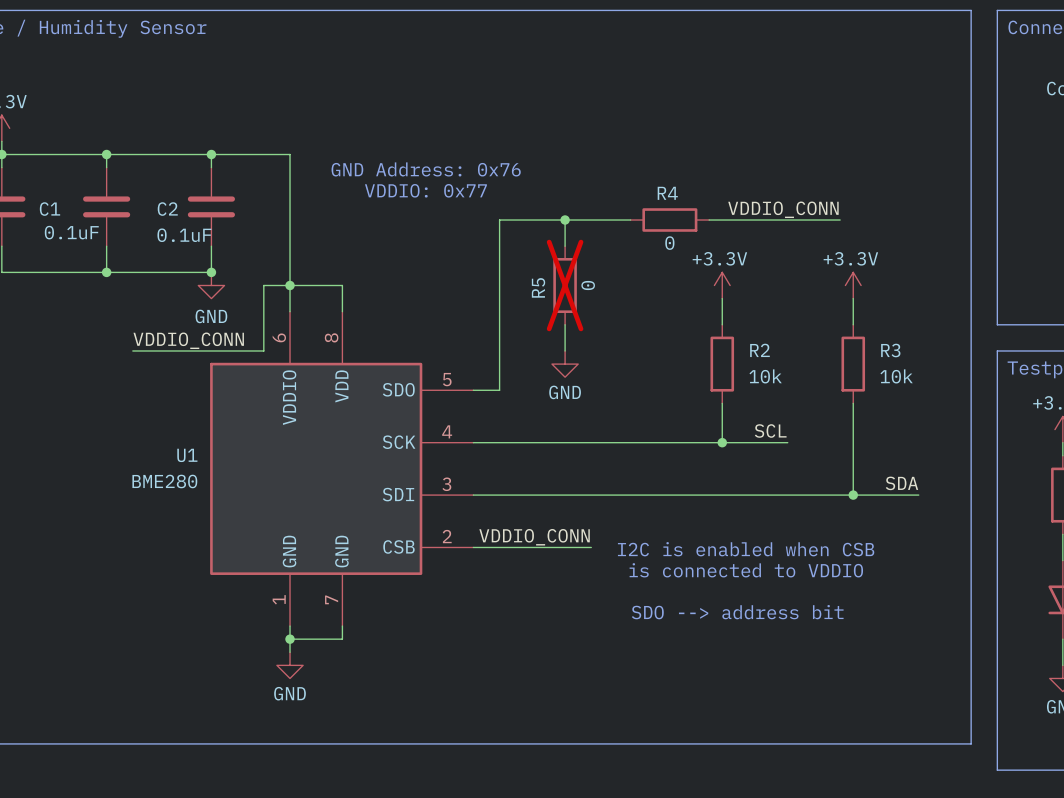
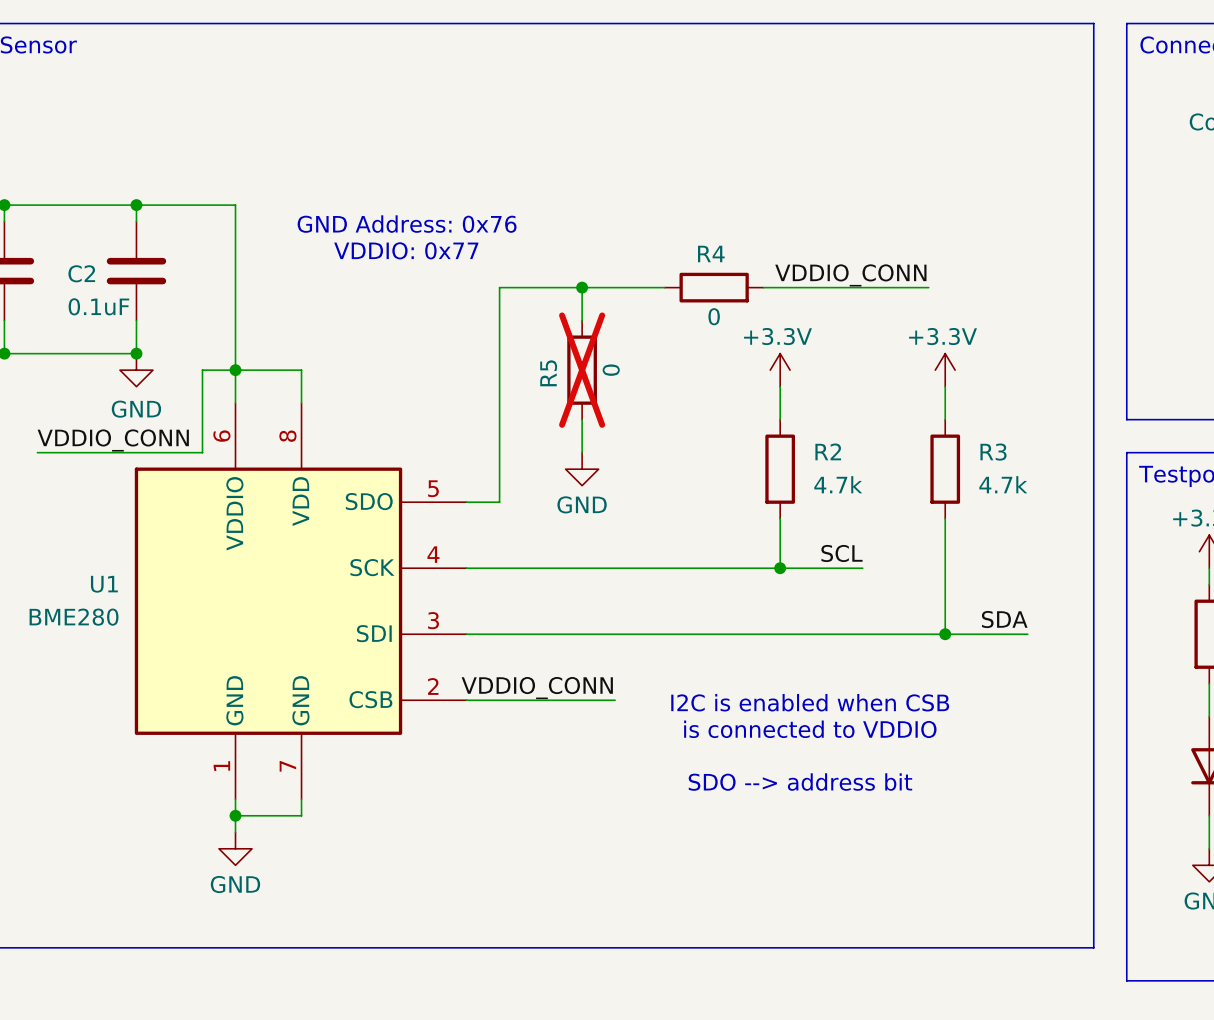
R2 value: 10k (765, 376) -> 4.7k (838, 484)
R3 value: 10k (896, 376) -> 4.7k (1003, 484)

